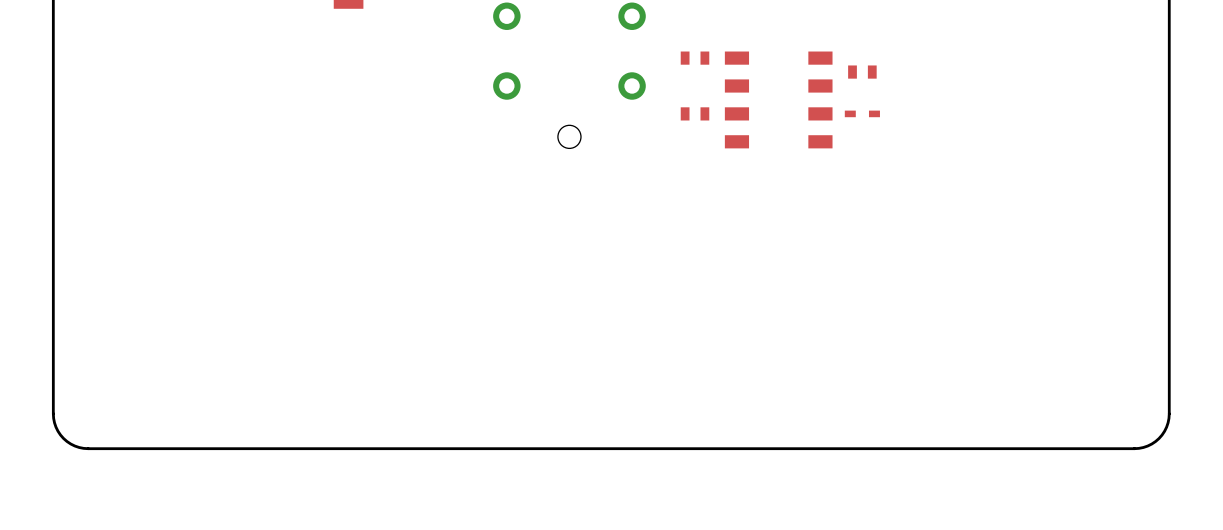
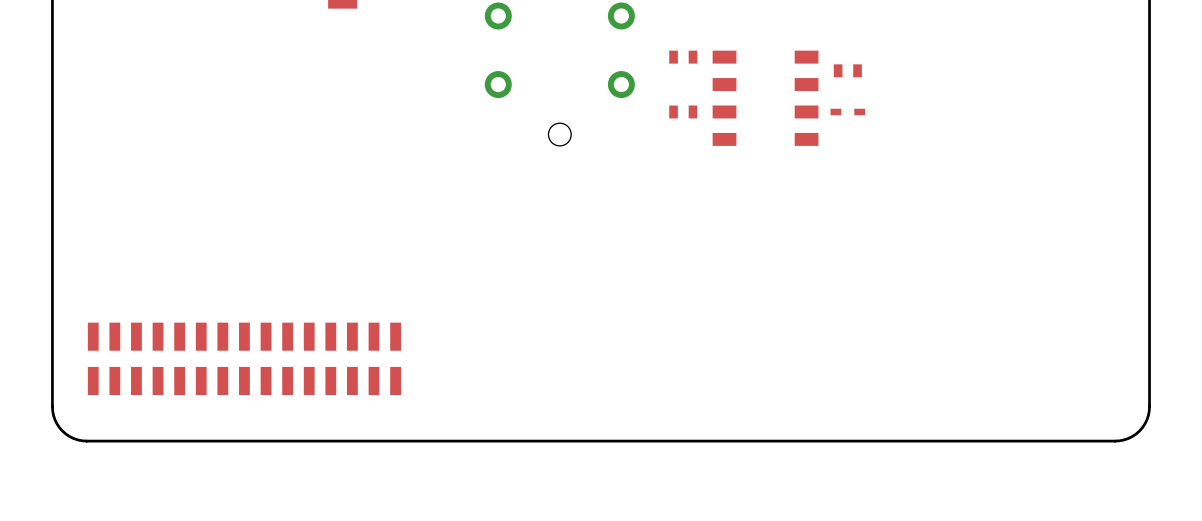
part: none -> (244, 358)

